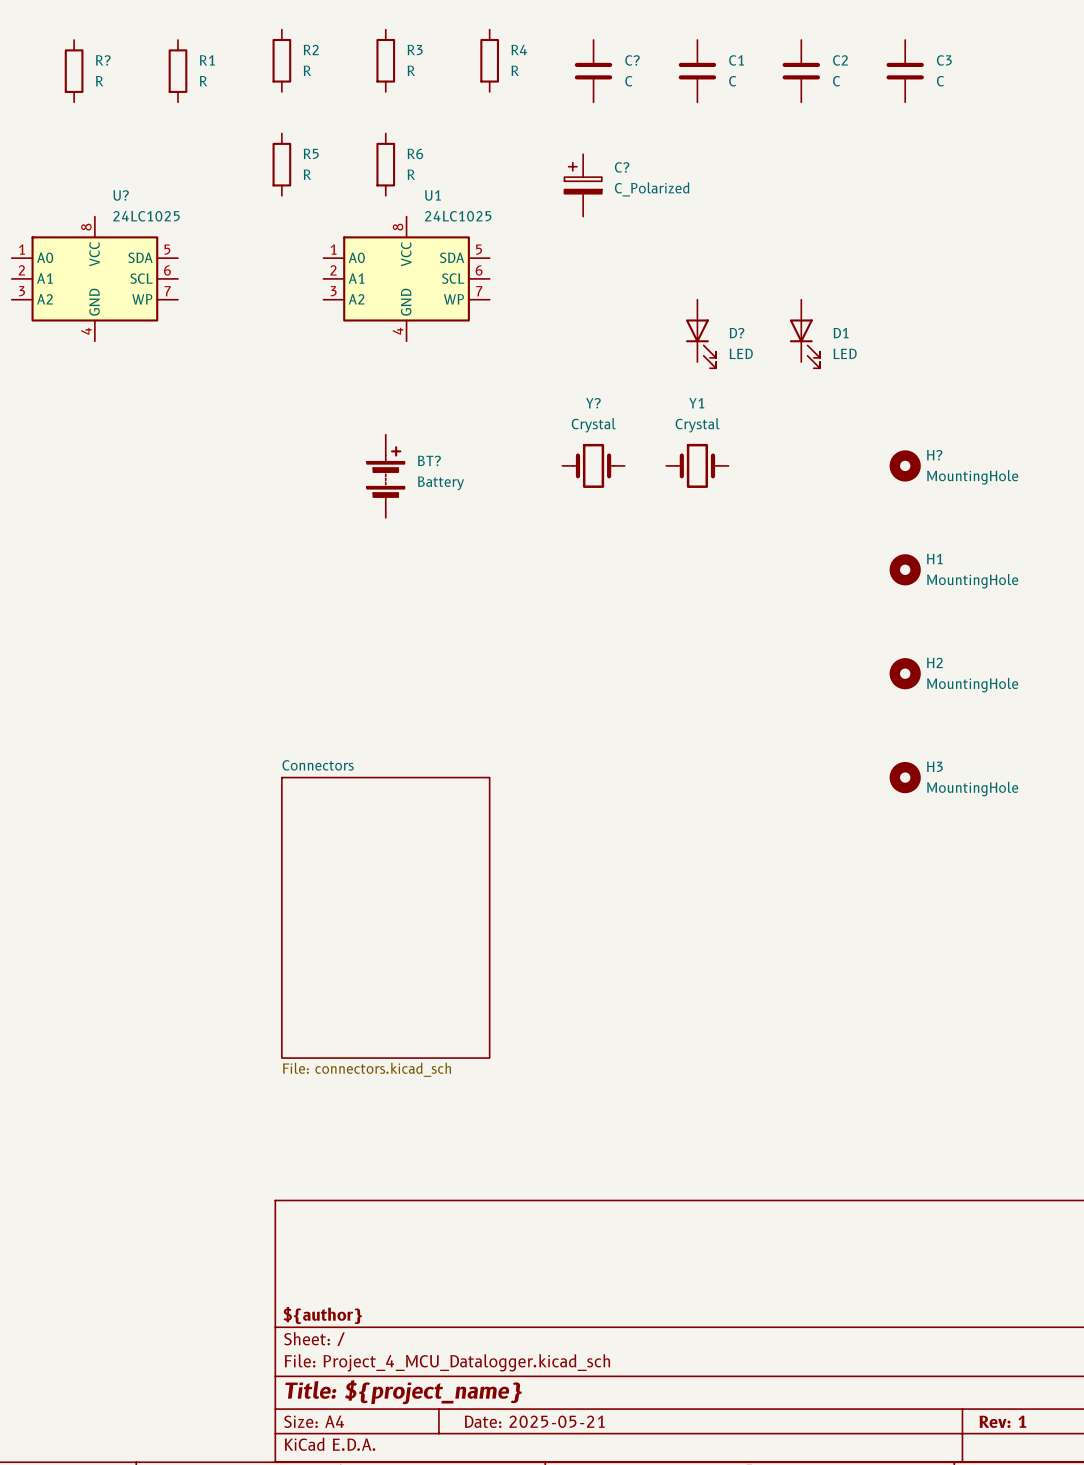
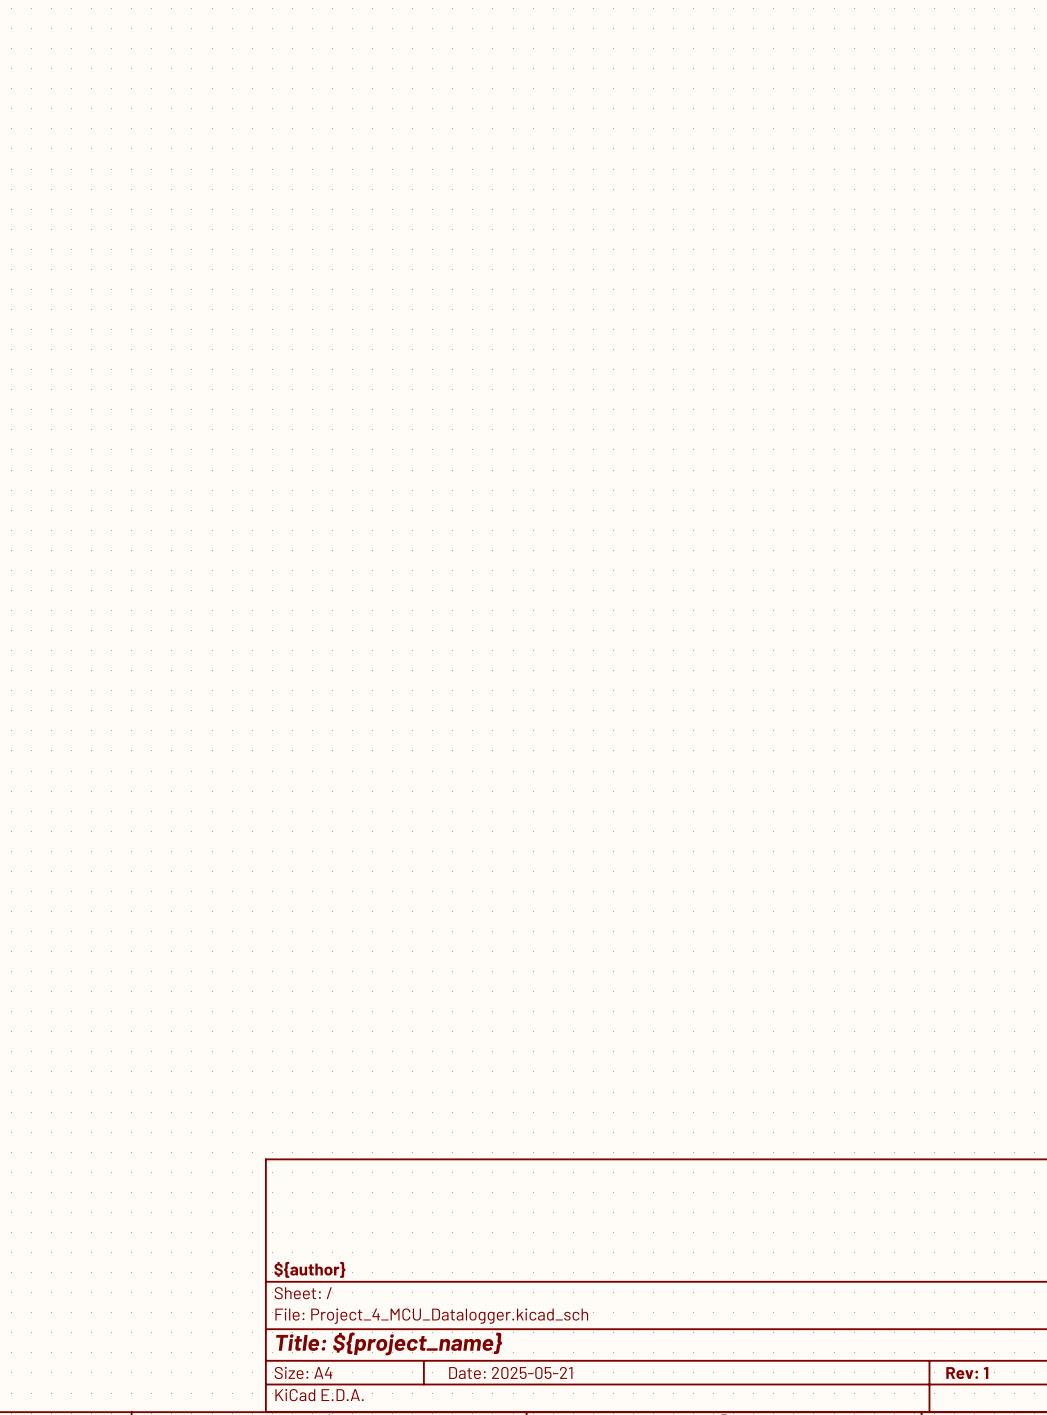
R2: R (281, 60) -> none
R3: R (385, 60) -> none
R4: R (489, 60) -> none
R?: R (74, 71) -> none
R1: R (177, 71) -> none
C?: C (593, 71) -> none
C1: C (697, 71) -> none
C2: C (801, 71) -> none
C3: C (905, 71) -> none
R5: R (281, 164) -> none
R6: R (385, 164) -> none
C?: C_Polarized (583, 185) -> none
U?: 24LC1025 (94, 278) -> none
U1: 24LC1025 (406, 278) -> none
D?: LED (701, 333) -> none
D1: LED (804, 333) -> none
Y?: Crystal (593, 465) -> none
Y1: Crystal (697, 465) -> none
H?: MountingHole (905, 465) -> none
BT?: Battery (385, 476) -> none
H1: MountingHole (905, 569) -> none
H2: MountingHole (905, 673) -> none
H3: MountingHole (905, 777) -> none
sheet Connectors: File: connectors.kicad_sch (385, 917) -> none

